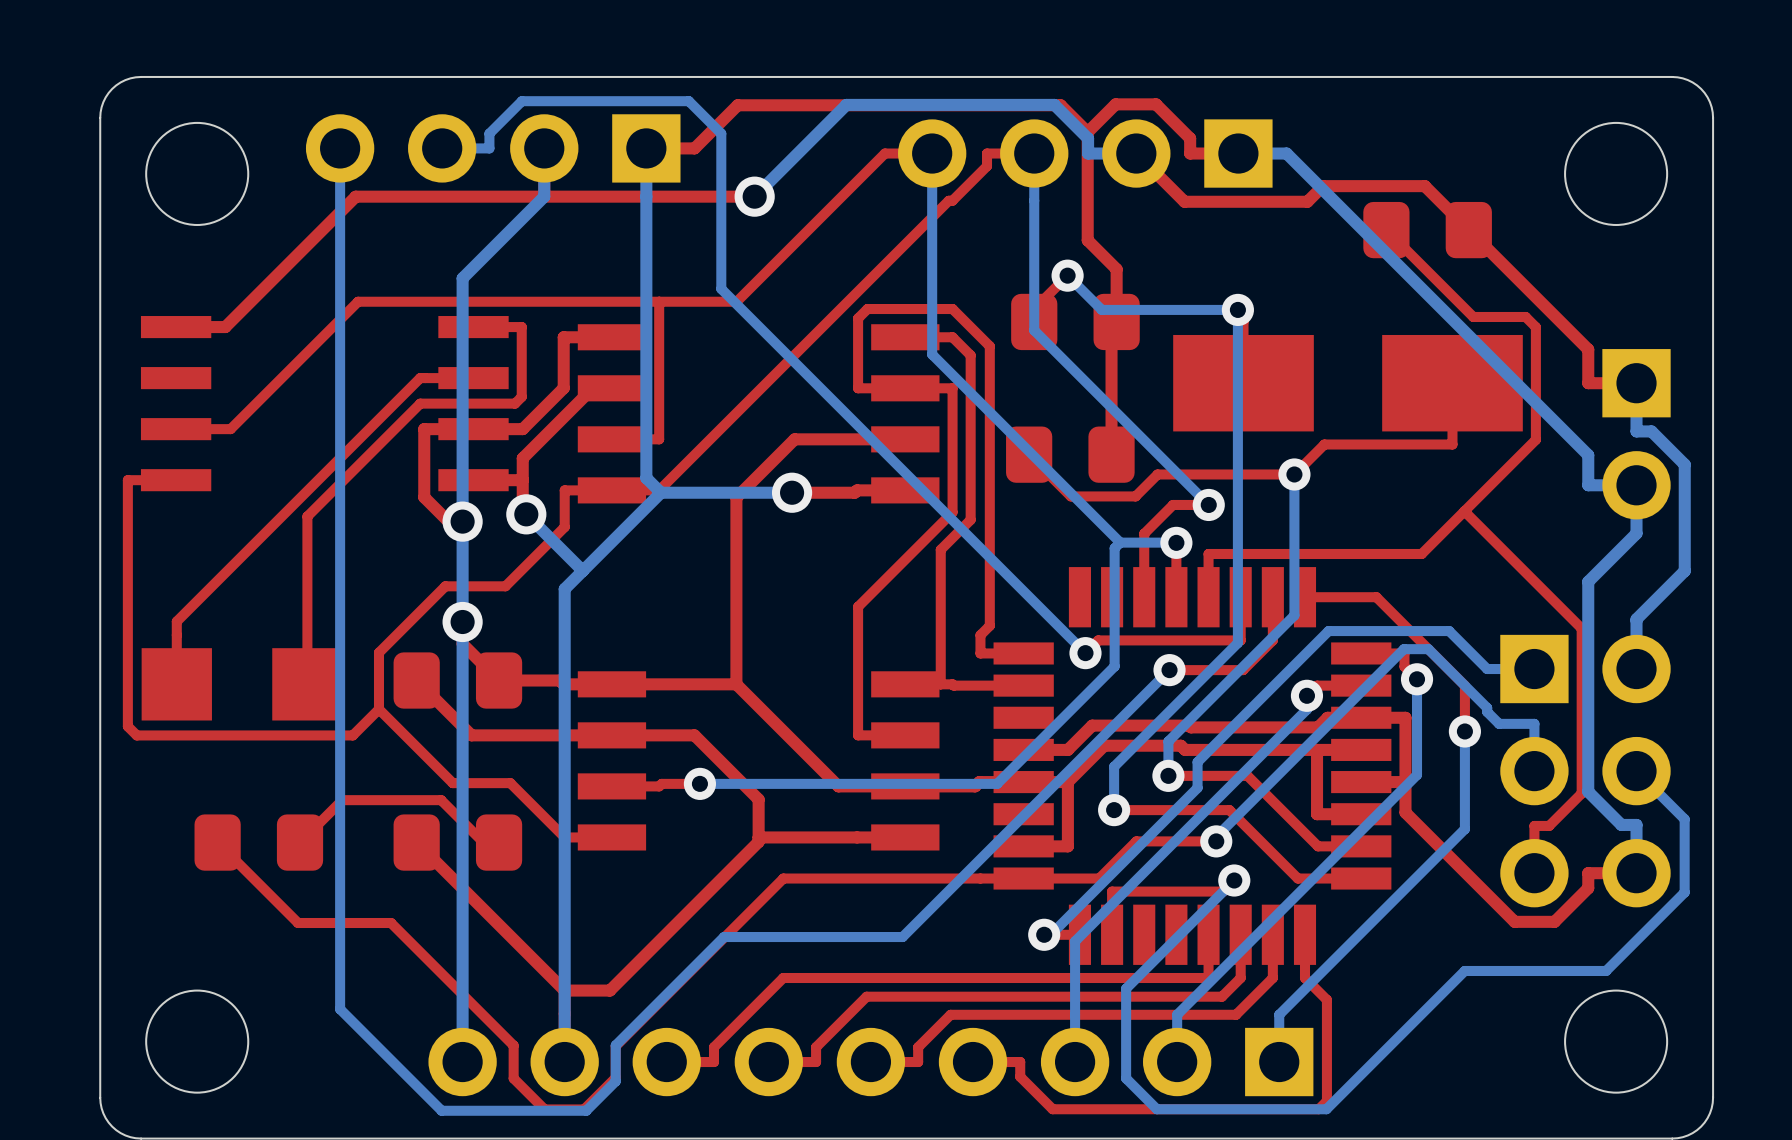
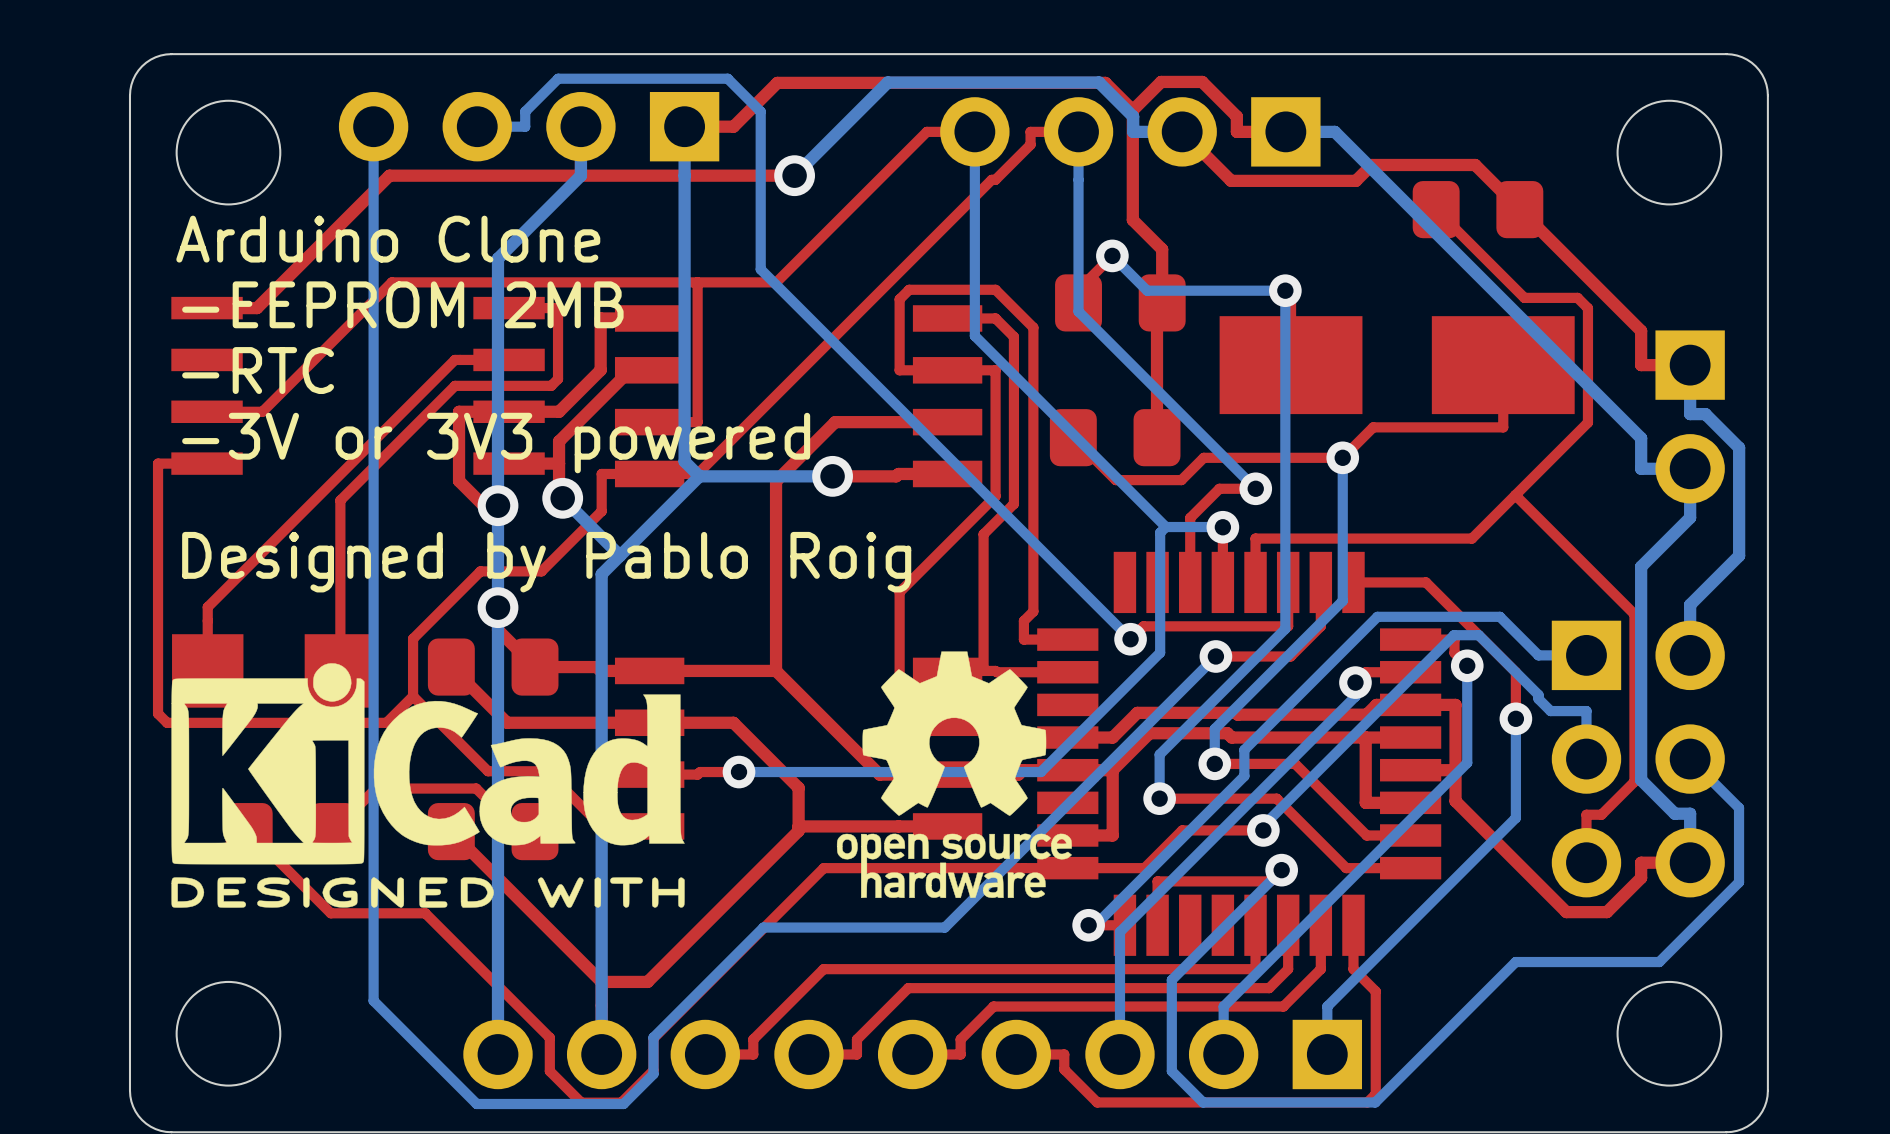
text: none -> Arduino Clone (388, 239)
text: none -> -EEPROM 2MB (402, 304)
text: none -> -RTC (258, 370)
text: none -> -3V or 3V3 powered (496, 443)
text: none -> Designed by Pablo Roig (546, 562)
drawing: none -> [836, 651, 1072, 899]
drawing: none -> [171, 663, 685, 908]

